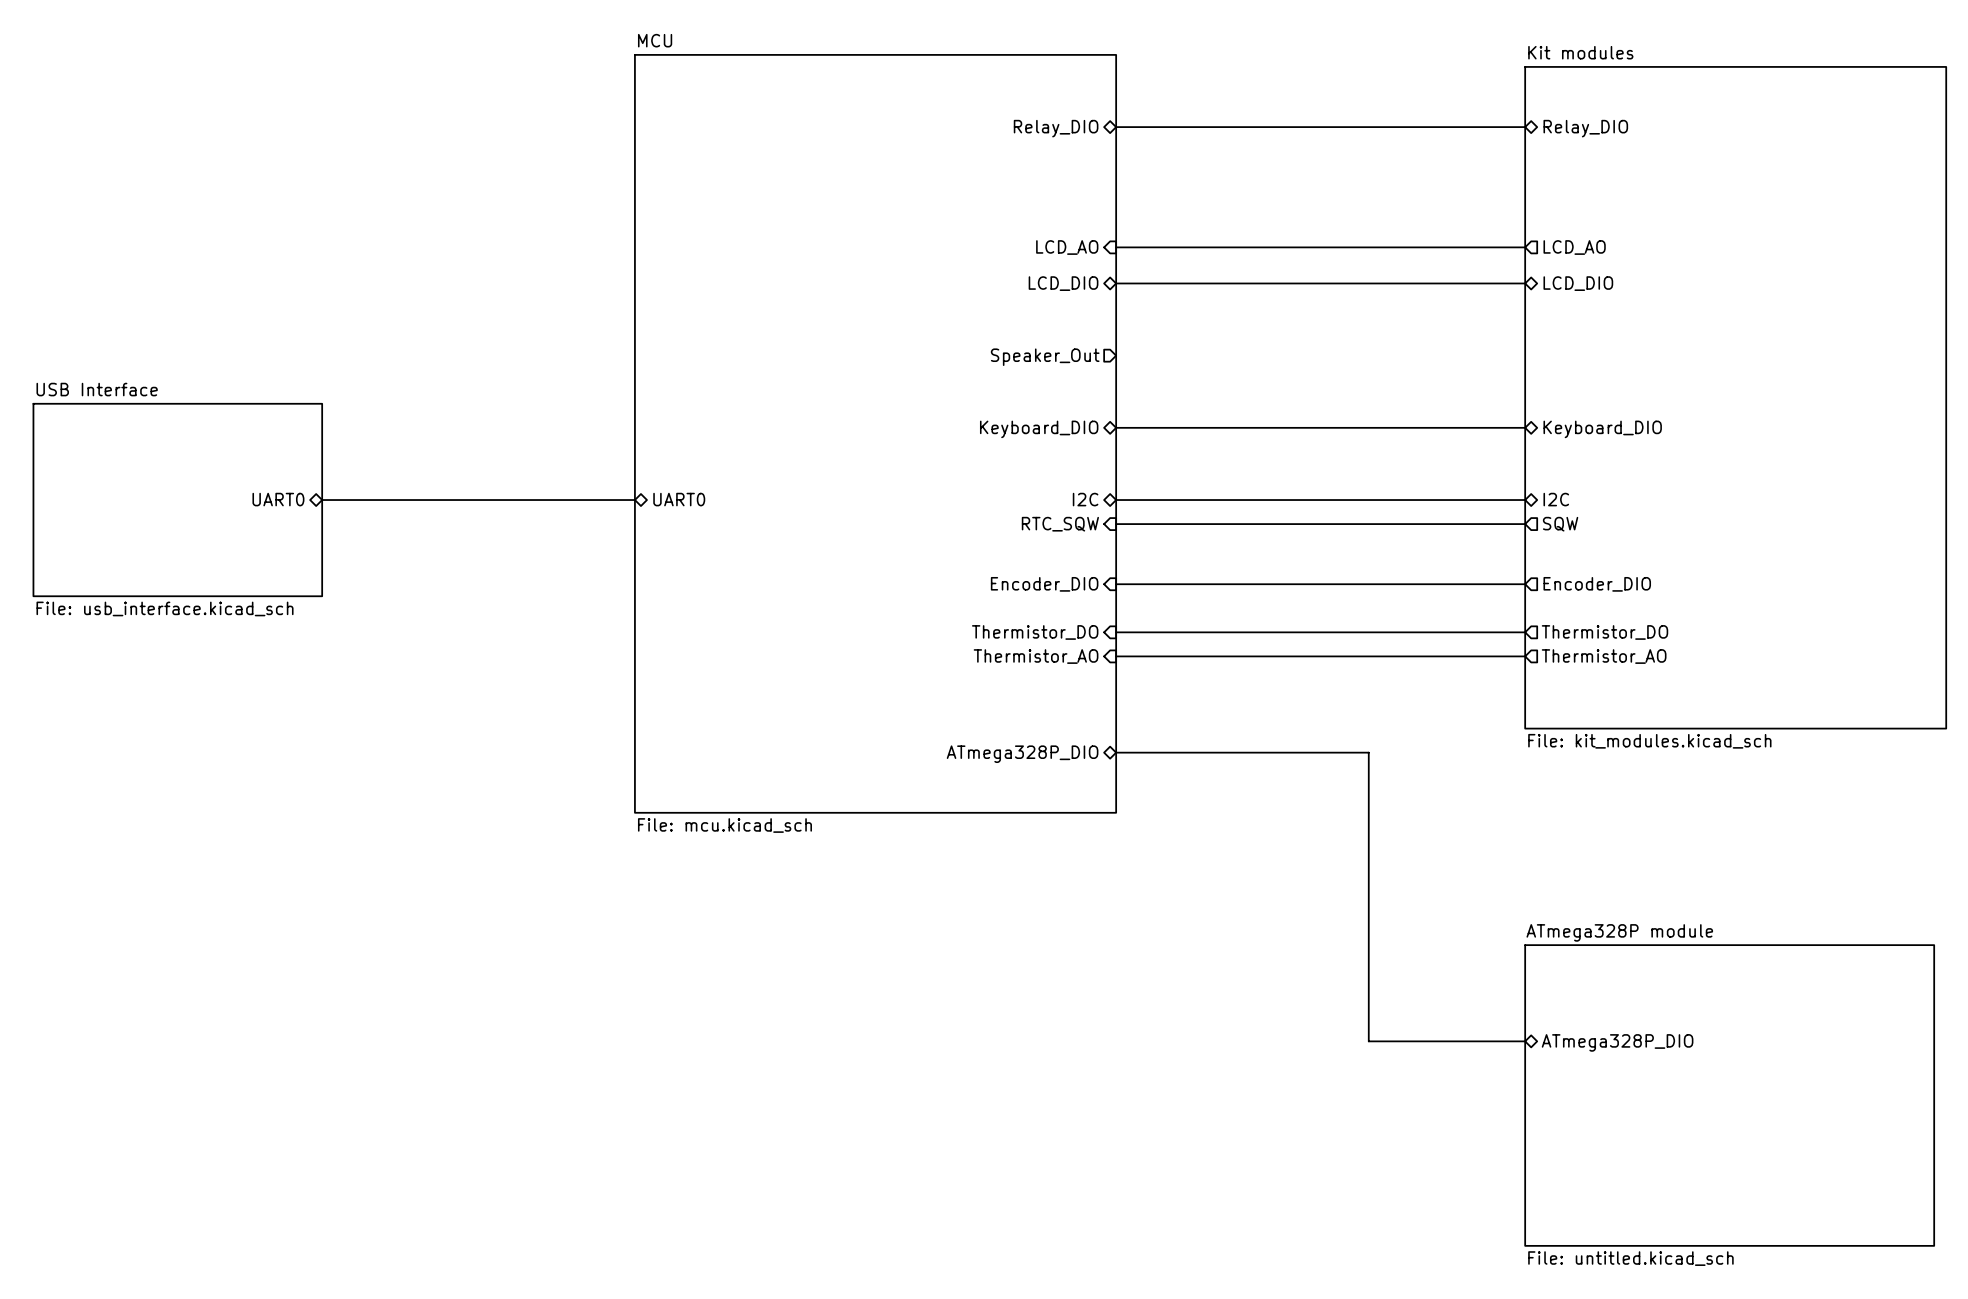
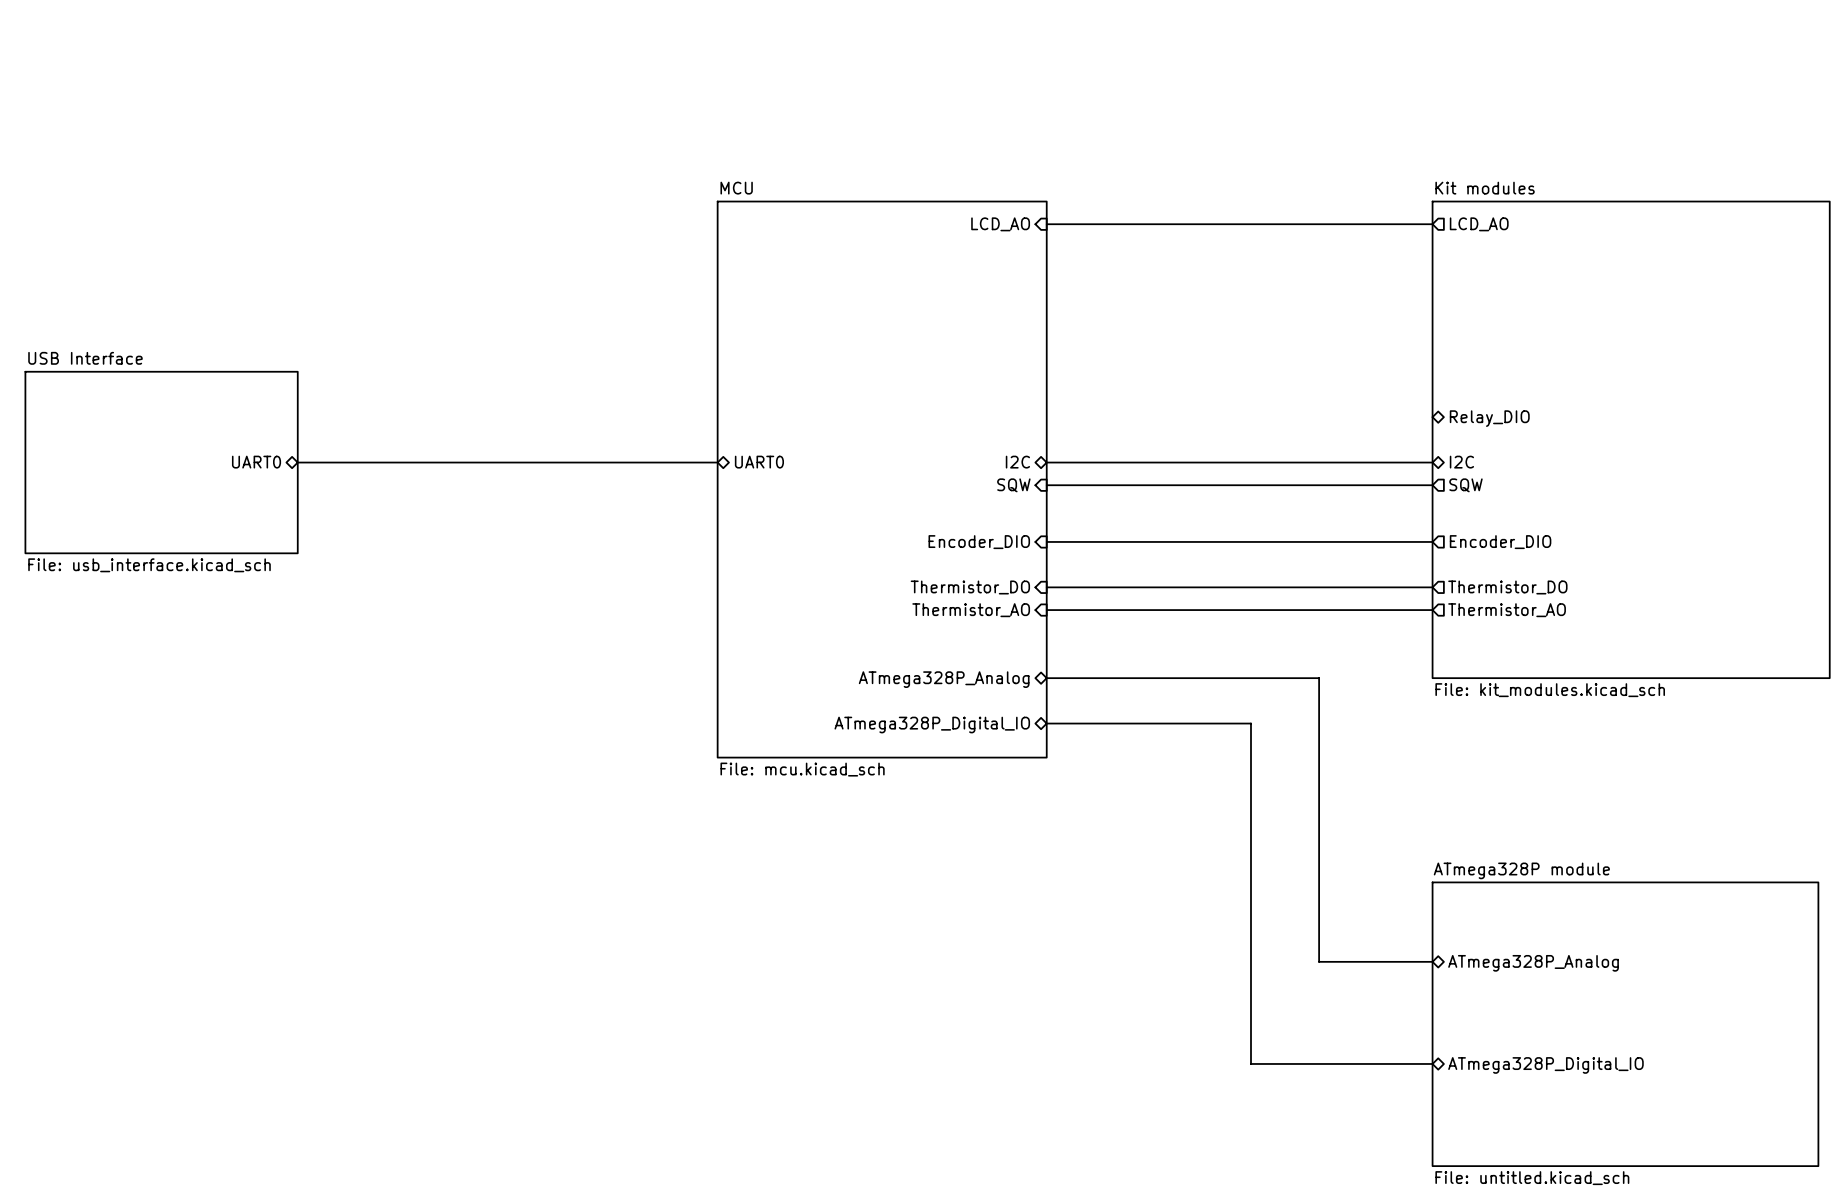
bus: (1116, 127) (1525, 127) -> none
sheet pin: Relay_DIO (1056, 128) -> none
sheet pin: Relay_DIO (1585, 128) -> none
sheet pin: LCD_DIO (1063, 283) -> none
bus: (1116, 283) (1525, 283) -> none
sheet pin: LCD_DIO (1578, 283) -> none
sheet pin: Speaker_Out (1045, 357) -> none
sheet Kit modules: File: kit_modules.kicad_sch (1735, 397) -> none
bus: (1116, 427) (1525, 427) -> none
sheet pin: Keyboard_DIO (1039, 429) -> none
sheet pin: Keyboard_DIO (1602, 429) -> none
sheet MCU: File: mcu.kicad_sch (875, 433) -> none
sheet pin: none -> Relay_DIO (1489, 418)
sheet Kit modules: none -> File: kit_modules.kicad_sch (1631, 439)
sheet pin position: UART0 (679, 499) -> UART0 (759, 462)
bus: none -> (592, 462) (717, 462)
sheet MCU: none -> File: mcu.kicad_sch (882, 479)
sheet pin: RTC_SQW (1060, 524) -> SQW (1013, 485)
bus: none -> (1046, 678) (1319, 678) (1319, 961) (1432, 961)
sheet pin: none -> ATmega328P_Analog (944, 679)
bus: (1116, 752) (1368, 752) (1368, 1041) (1525, 1041) -> none
sheet pin: ATmega328P_DIO (1022, 754) -> none
bus: none -> (1046, 723) (1250, 723) (1250, 1063) (1432, 1063)
sheet pin: none -> ATmega328P_Digital_IO (932, 725)
sheet pin: ATmega328P_DIO (1617, 1042) -> ATmega328P_Analog (1533, 963)
sheet pin: none -> ATmega328P_Digital_IO (1545, 1065)

